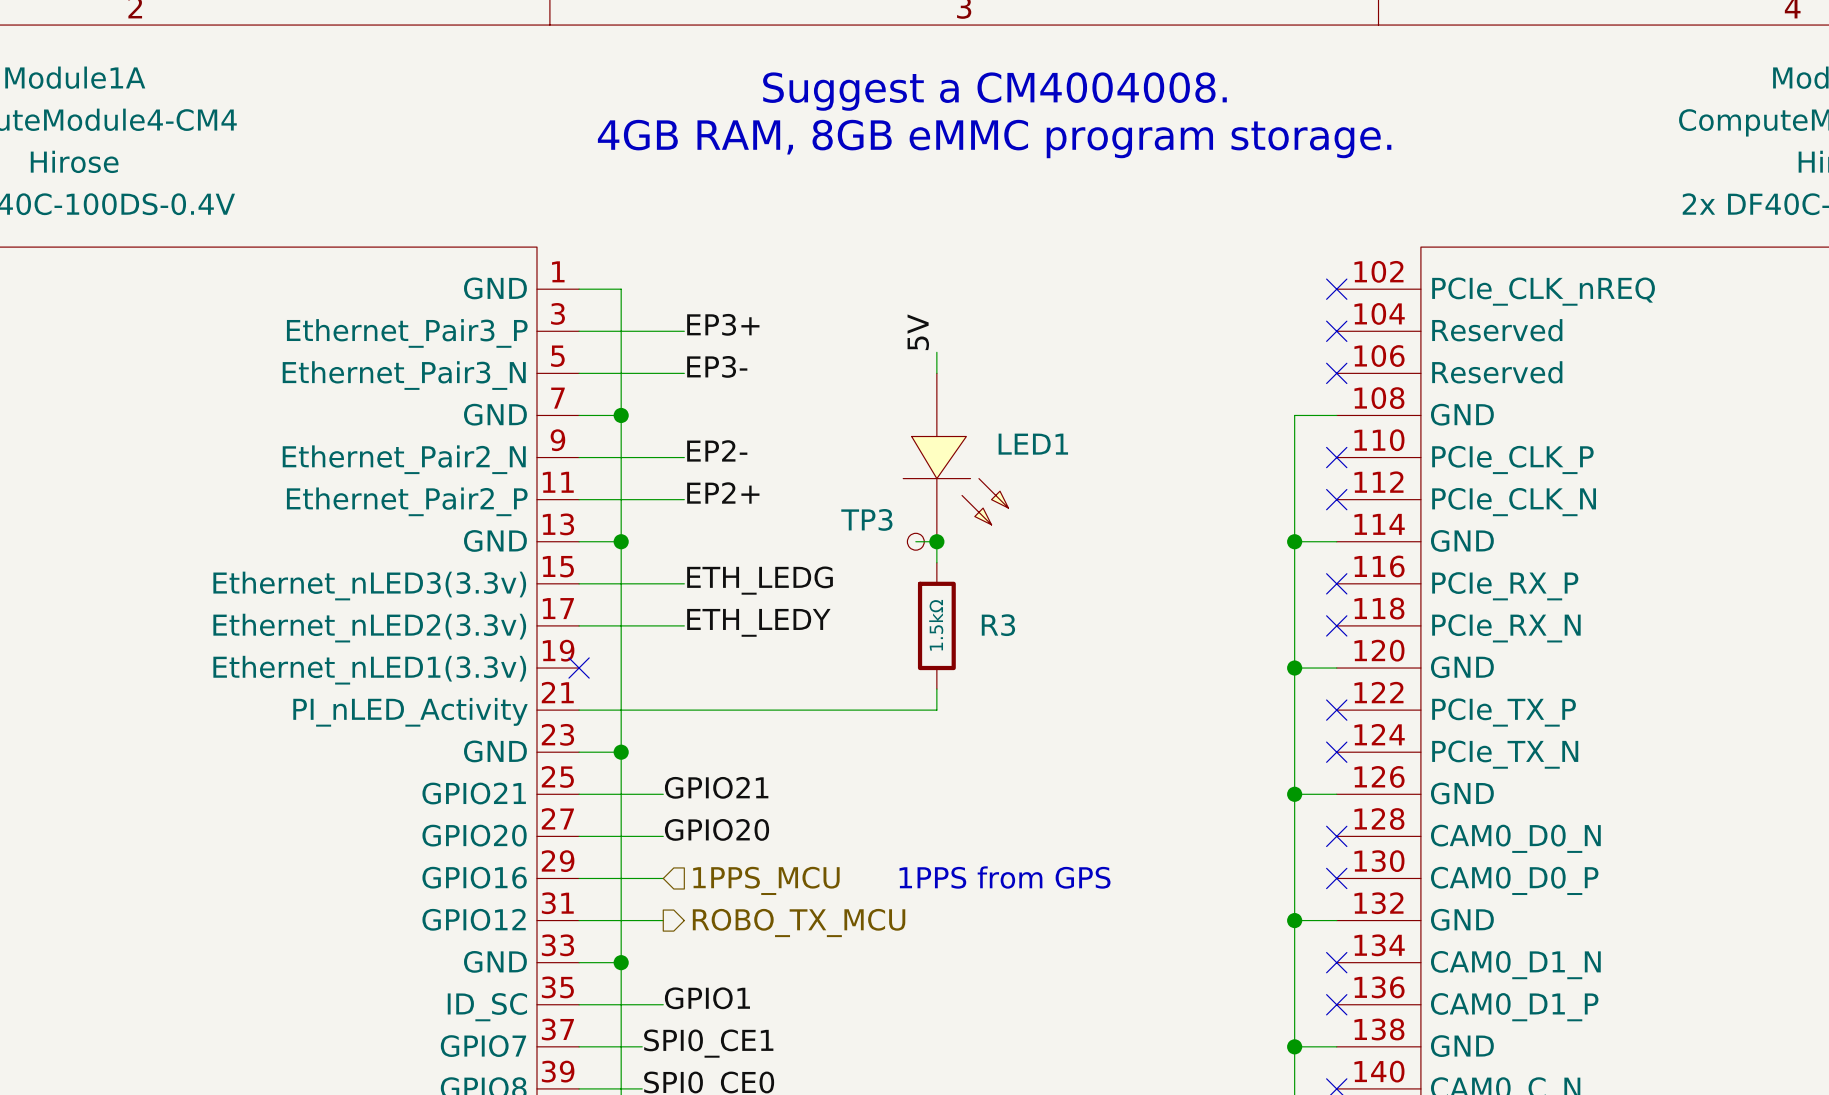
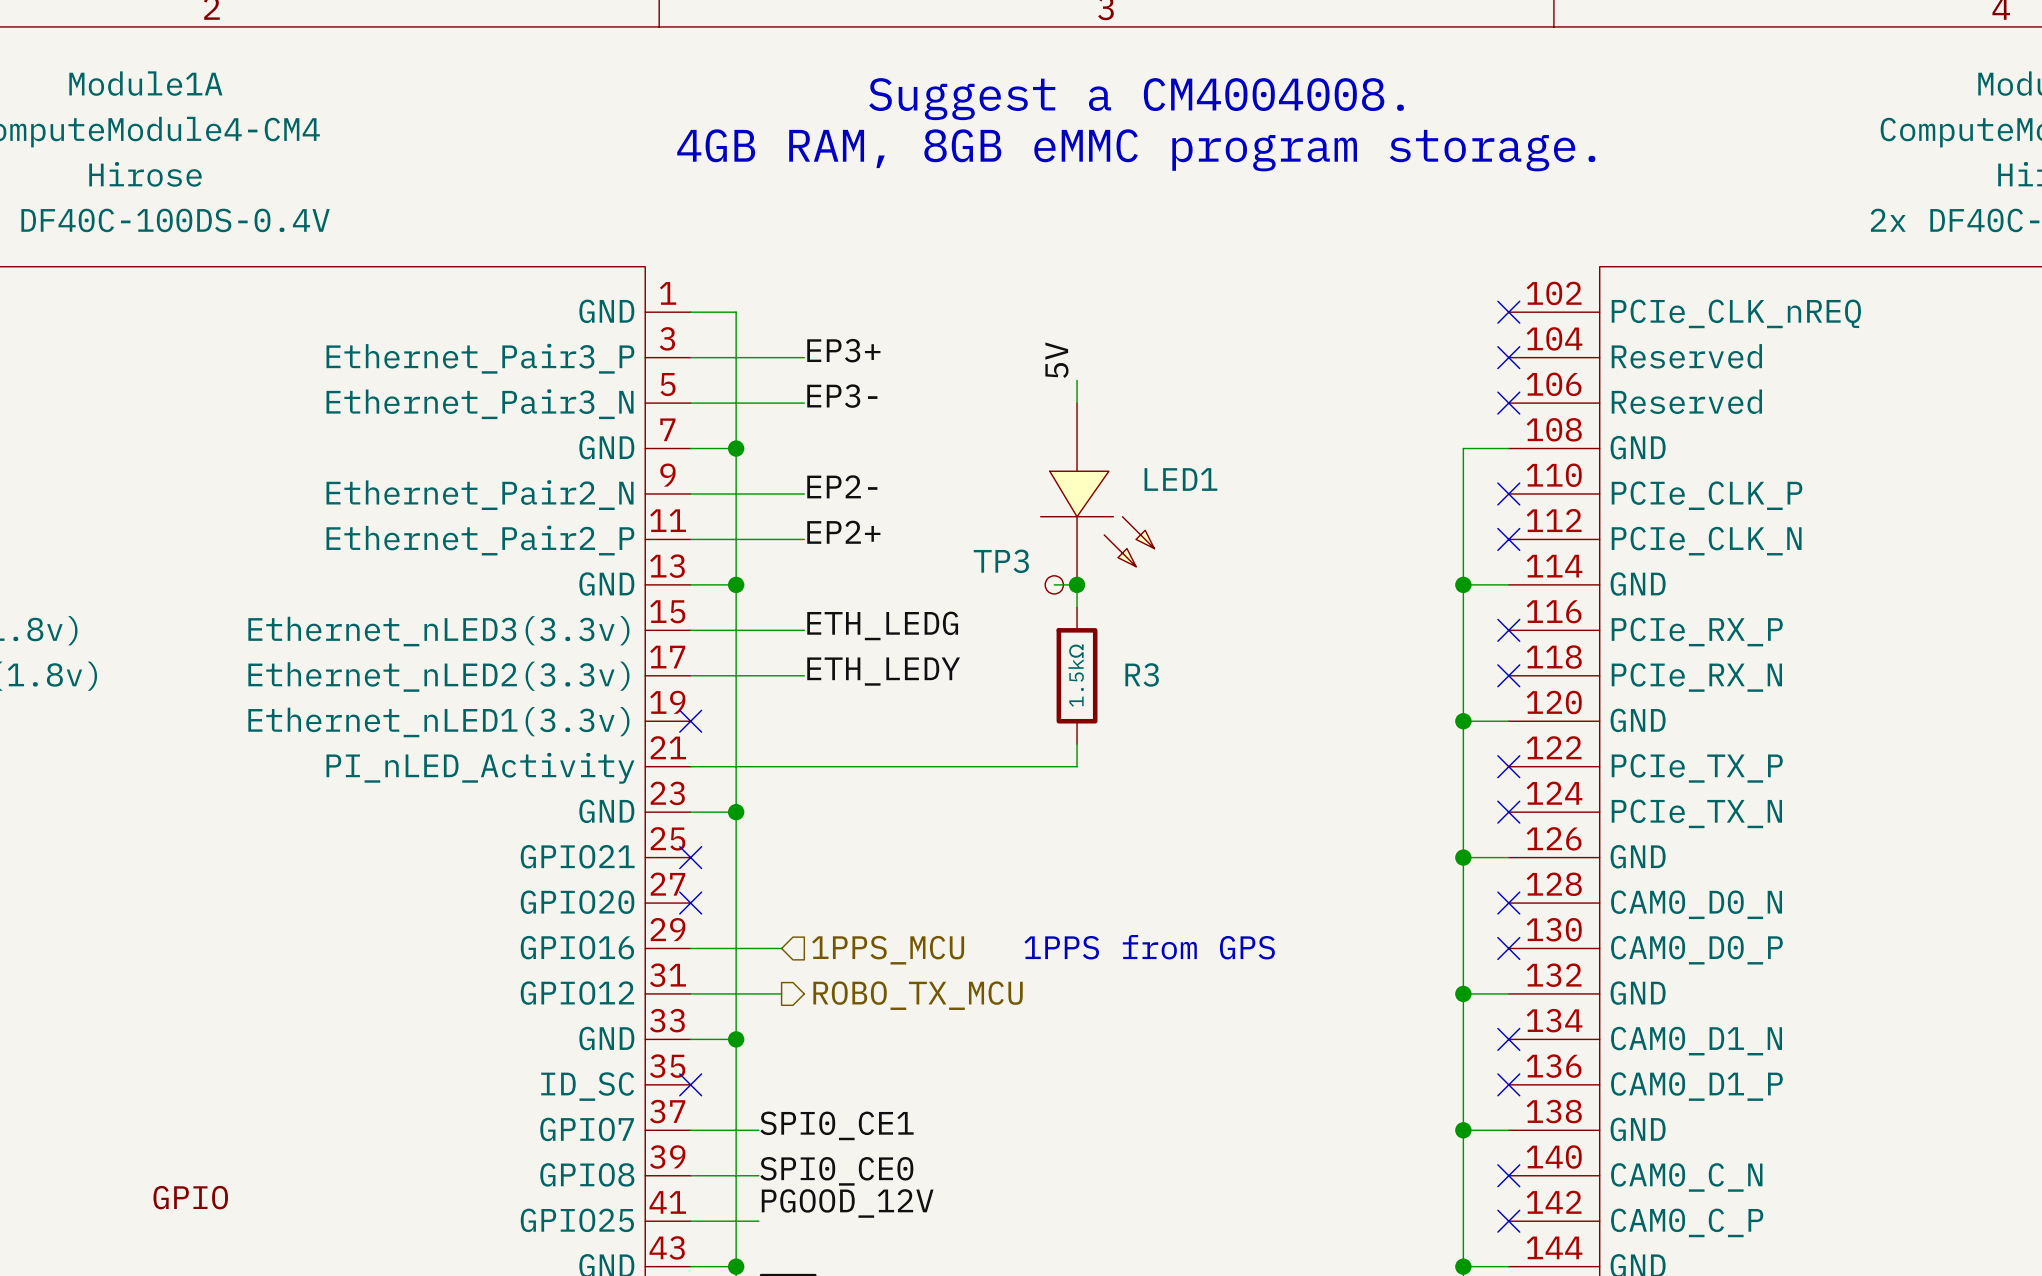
label: GPIO21 (716, 787) -> none
wire: (579, 794) (663, 794) -> none
no-connect mark: none -> (690, 857)
label: GPIO20 (716, 829) -> none
wire: (579, 836) (663, 836) -> none
no-connect mark: none -> (690, 903)
label: GPIO1 (707, 998) -> none
wire: (579, 1004) (663, 1004) -> none
no-connect mark: none -> (690, 1084)

